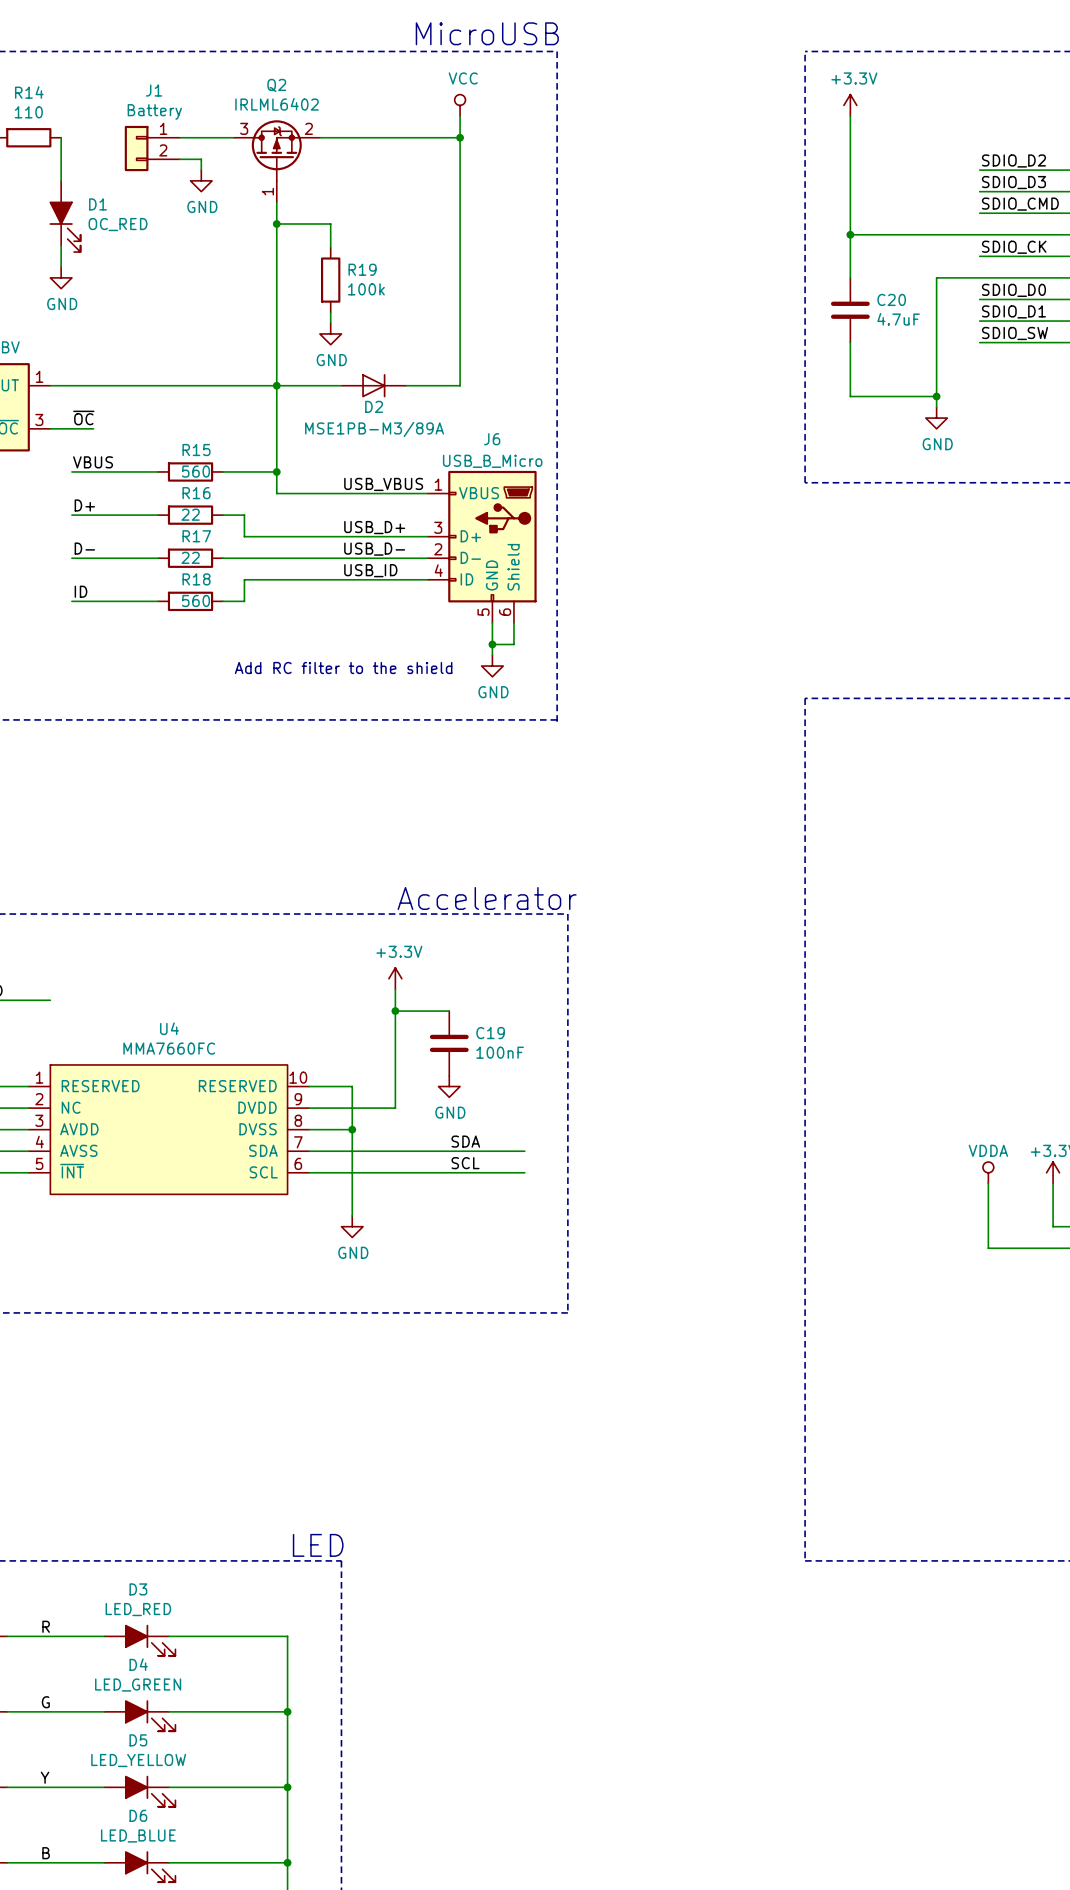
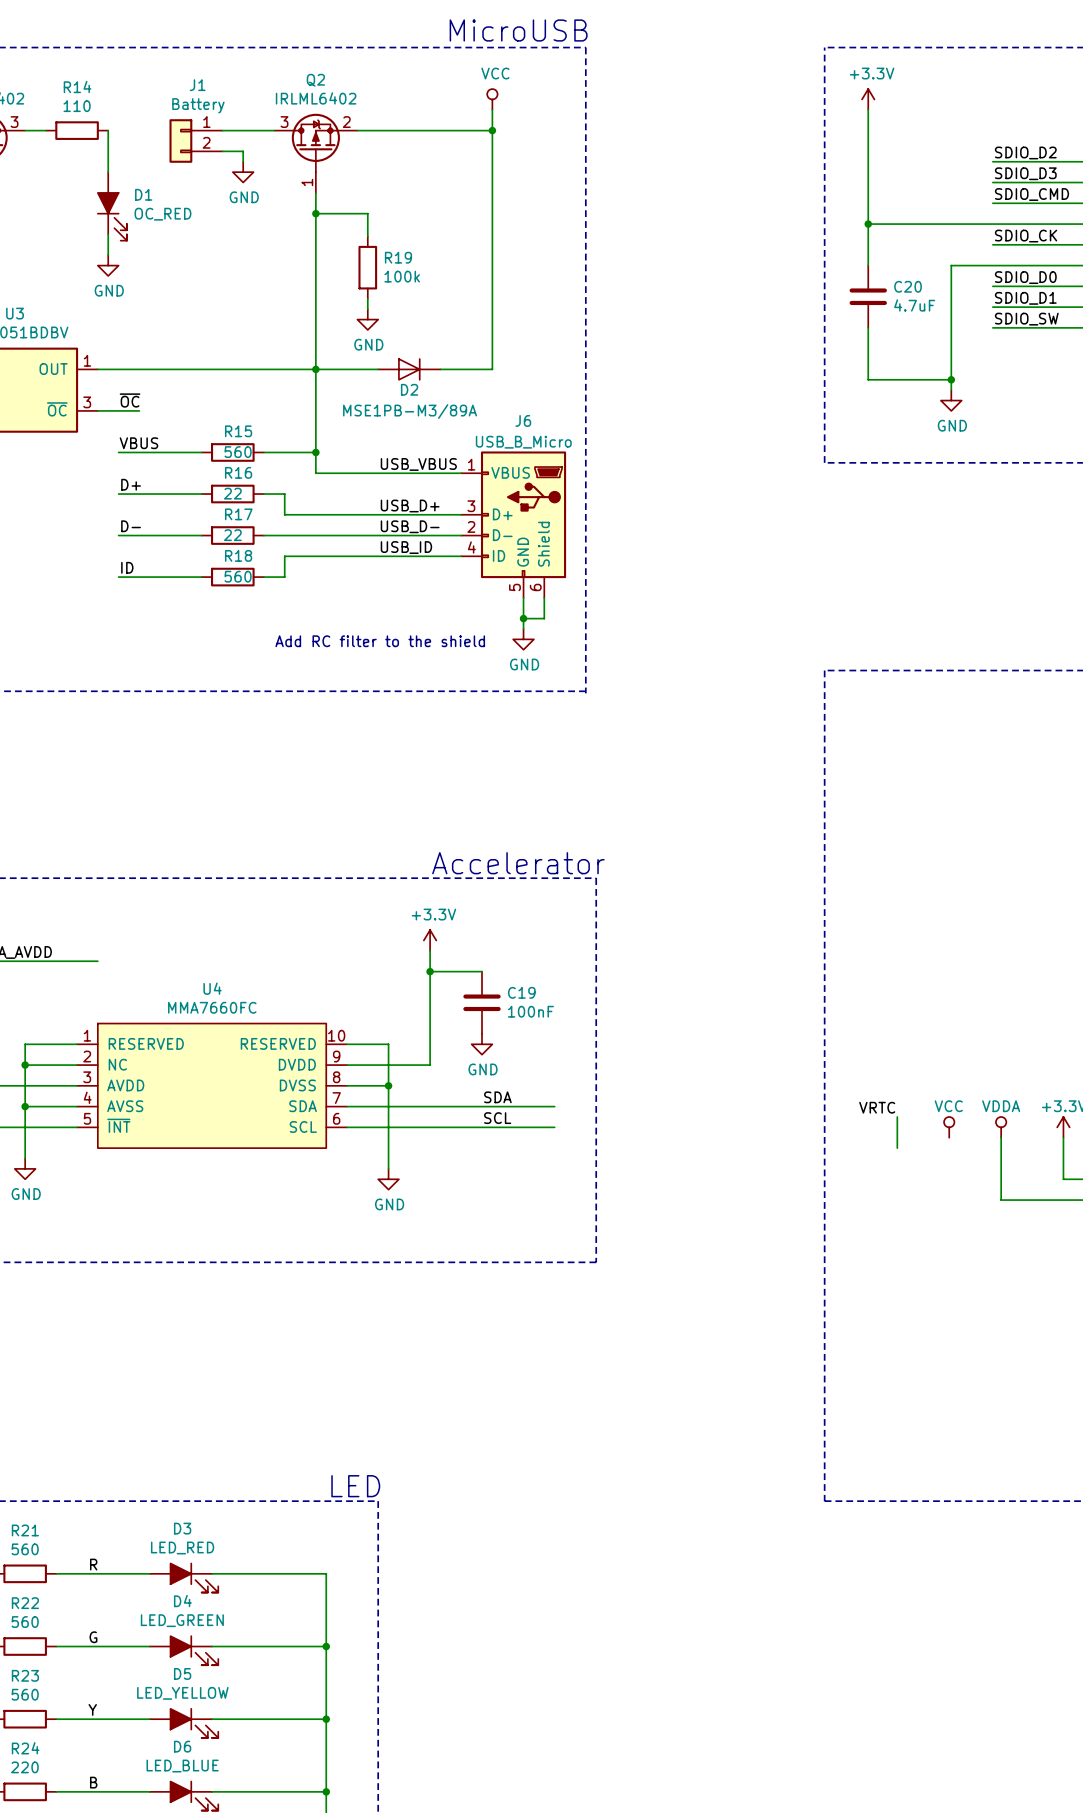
label: none -> VRTC (877, 1107)
wire: none -> (897, 1116) (897, 1148)
power symbol: none -> VCC (949, 1127)

